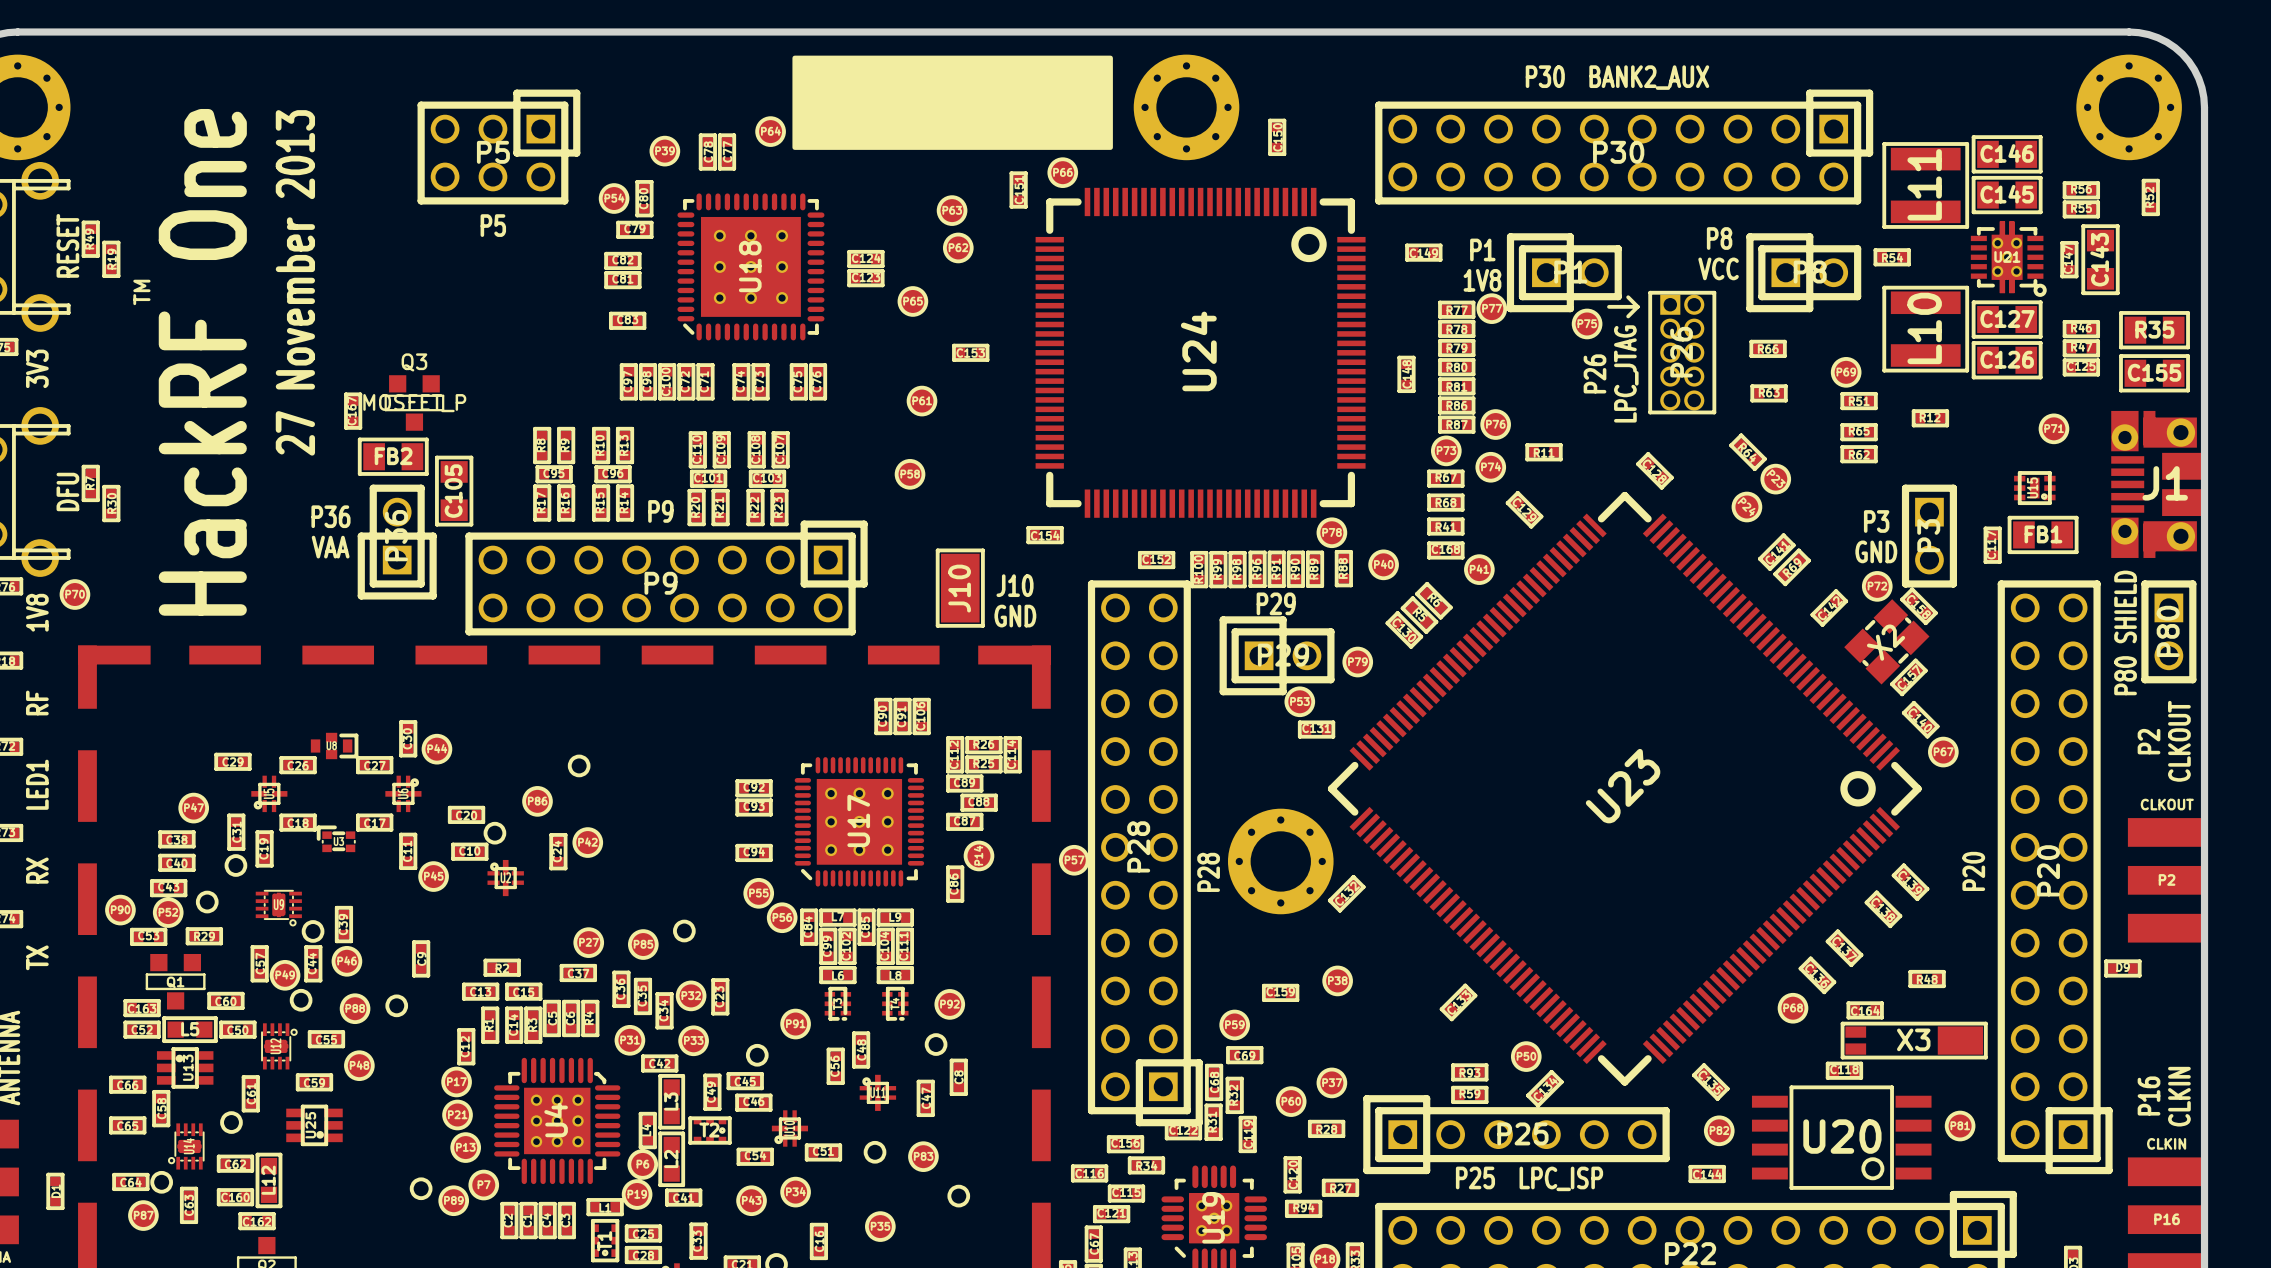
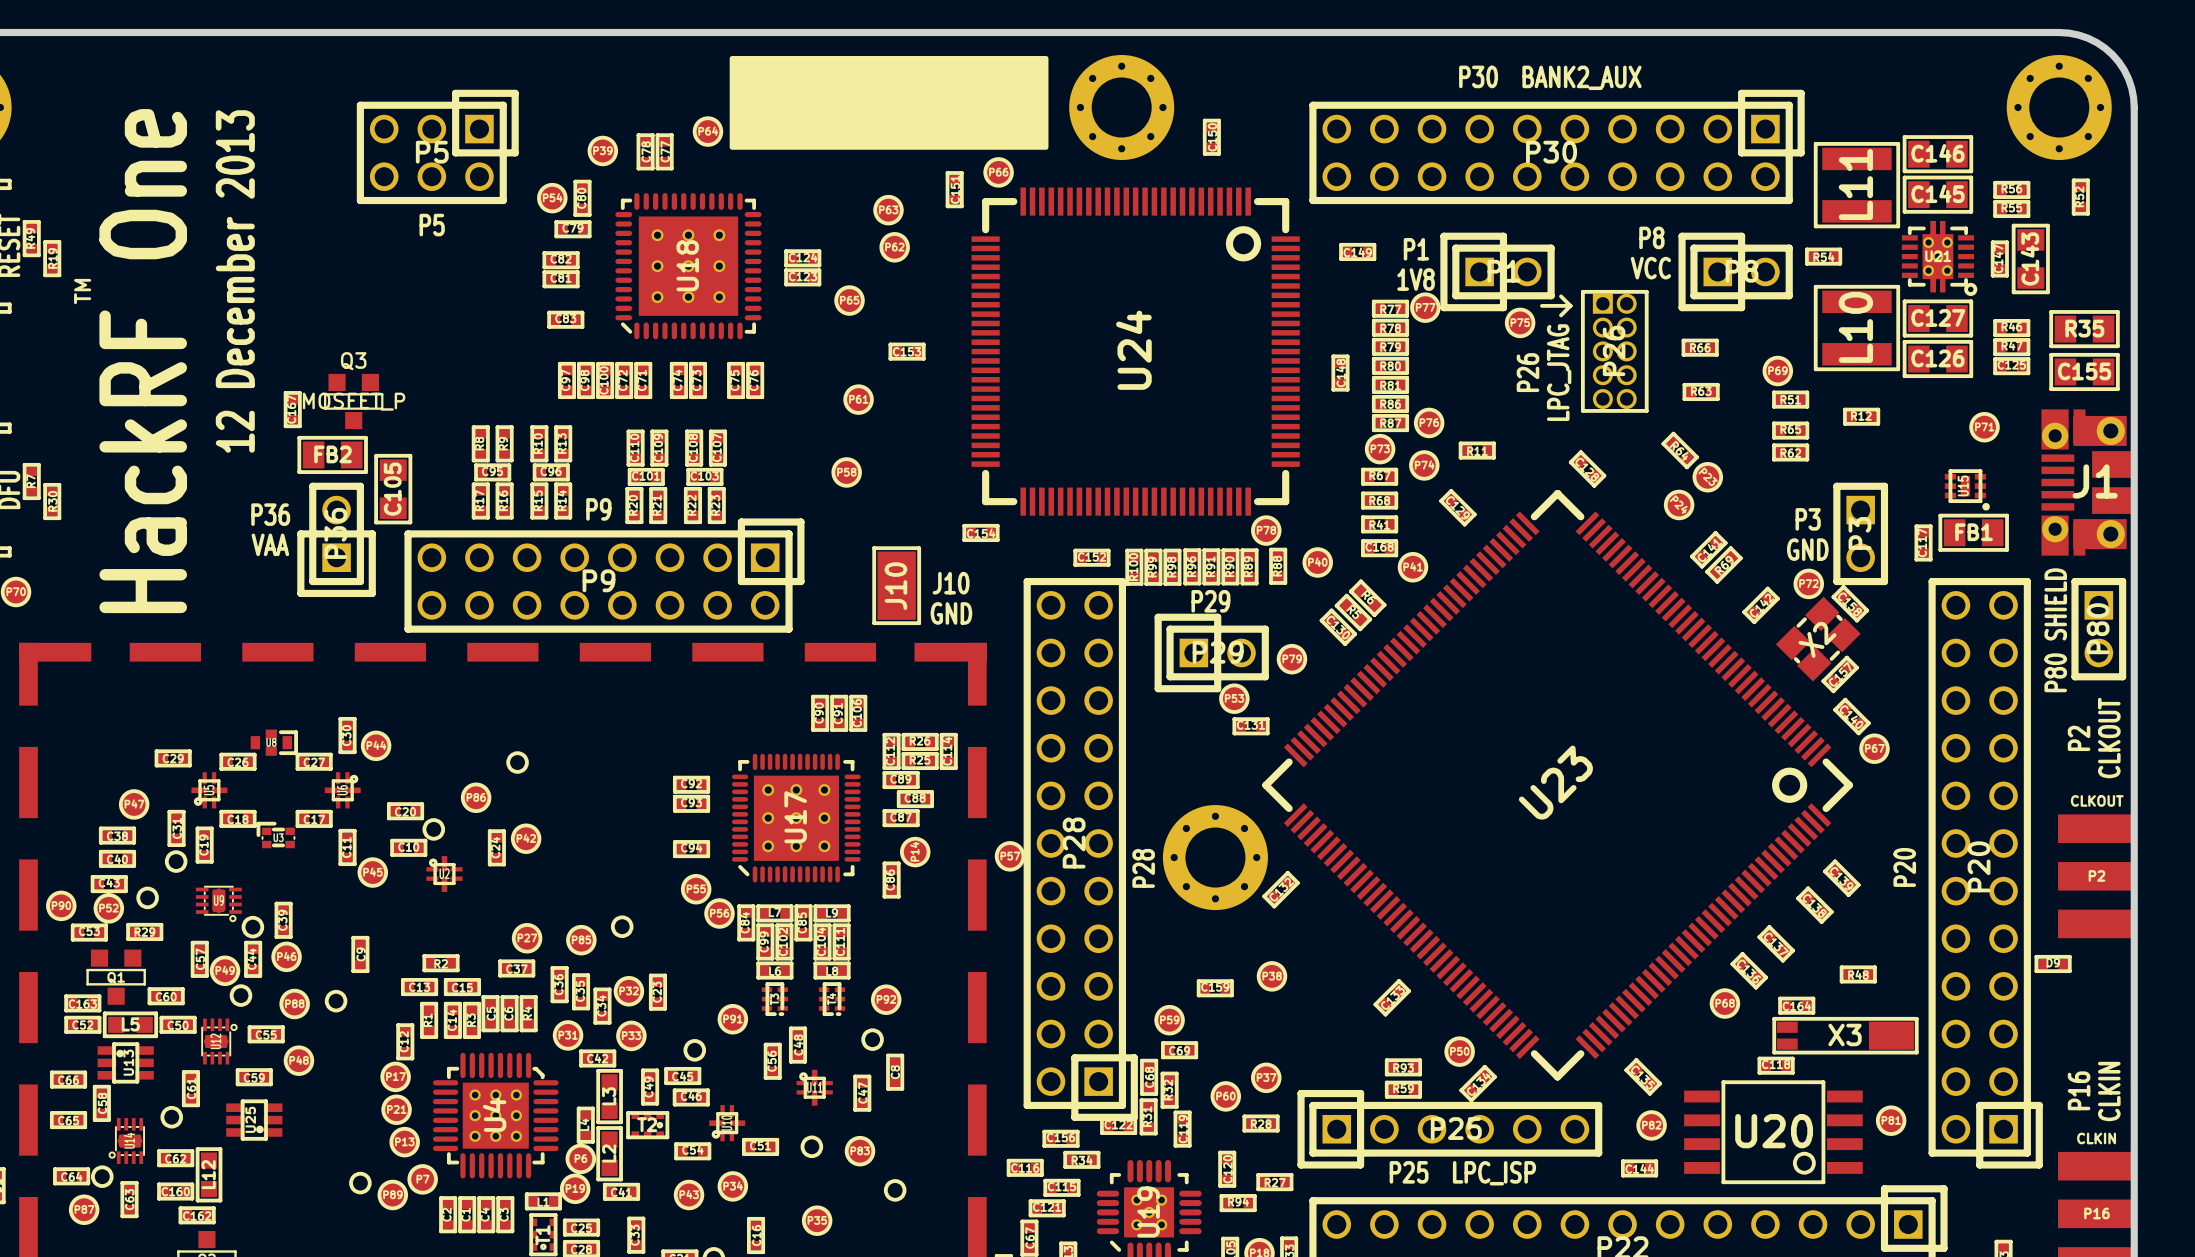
text: 27 November 2013 (295, 282) -> 12 December 2013 (235, 281)
U15 footprint: [2014, 471, 2056, 506] -> [1944, 469, 1990, 511]

